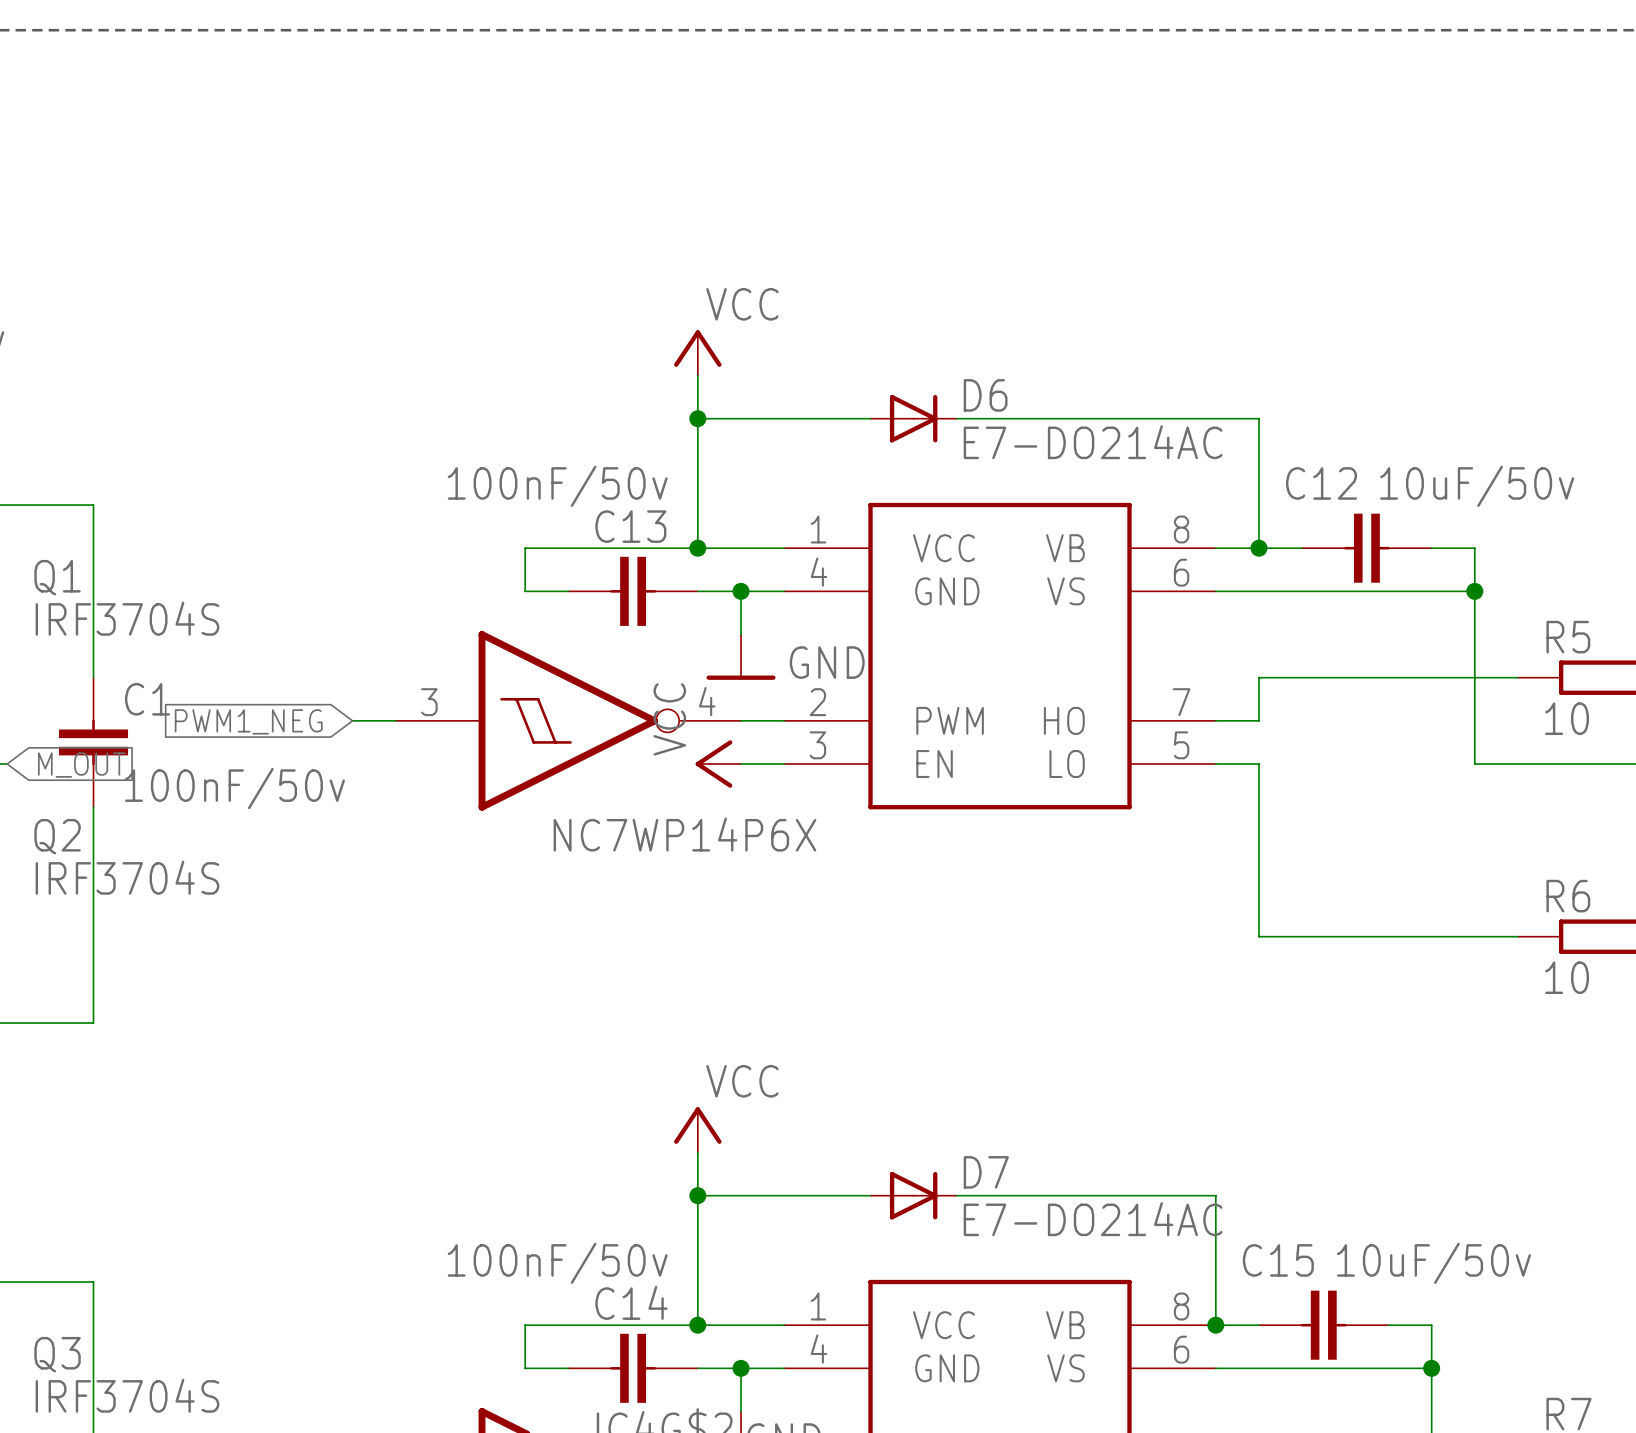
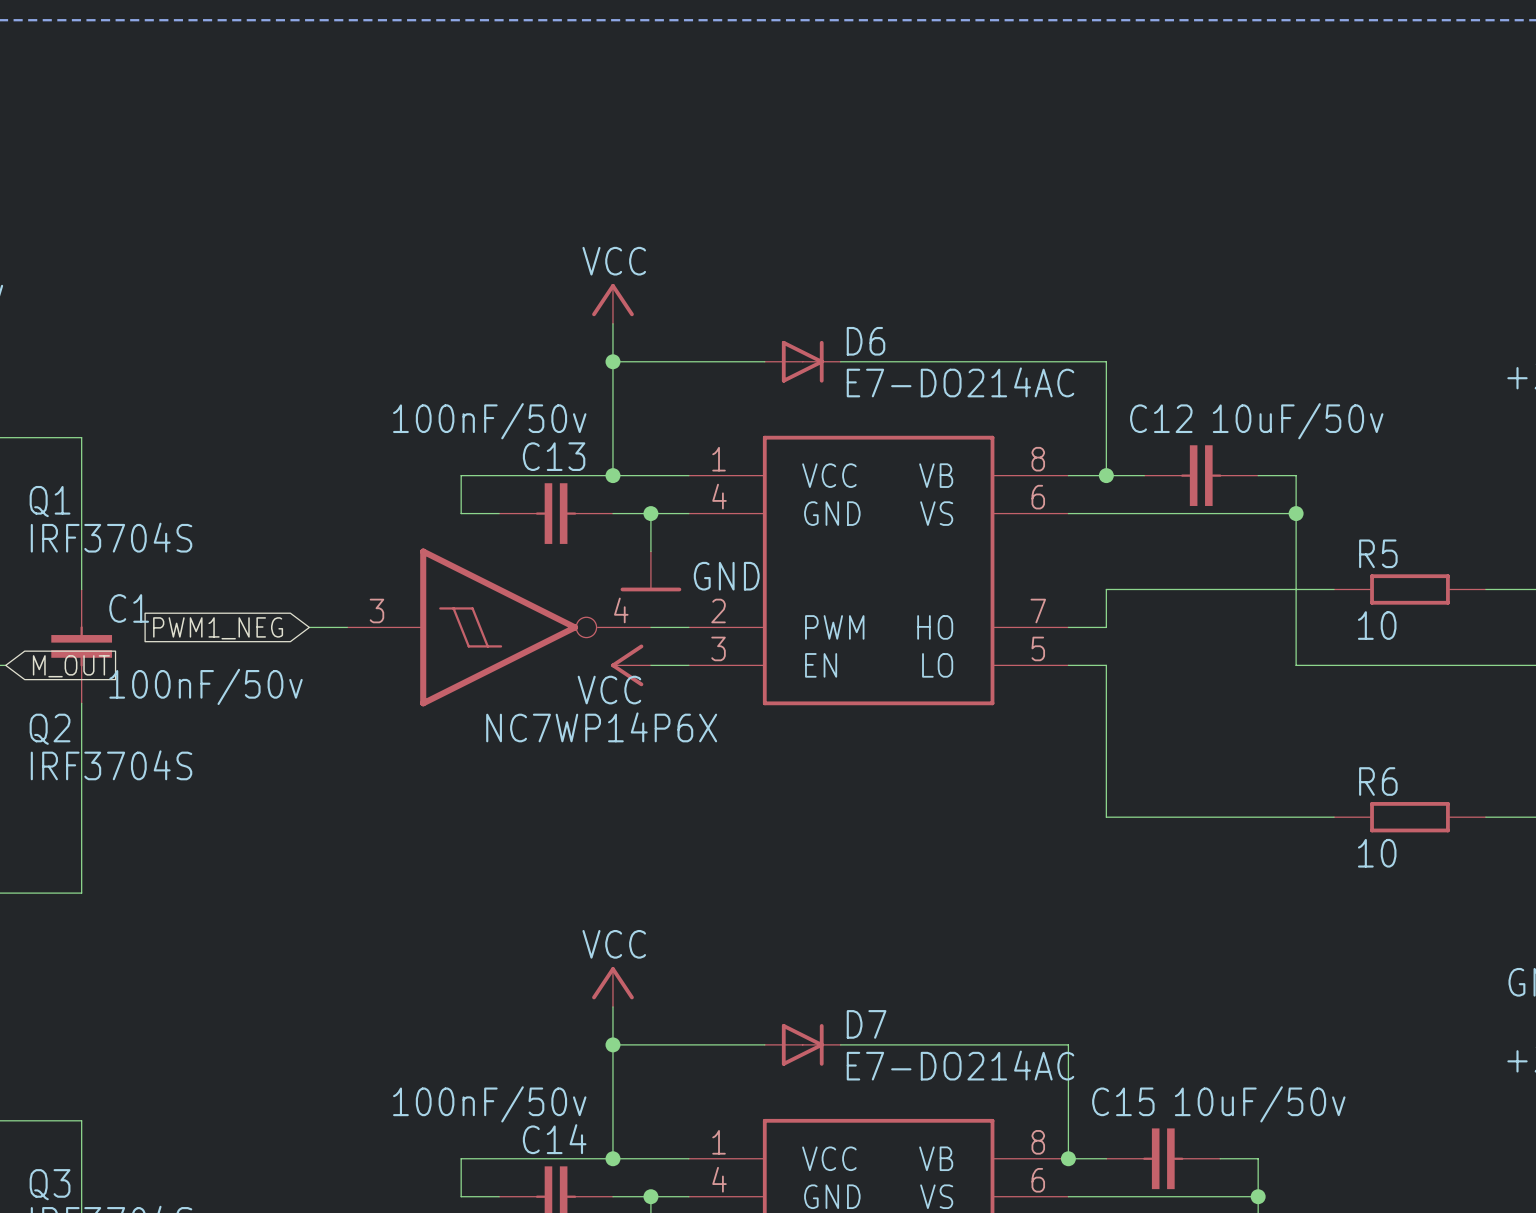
power symbol text position: VCC (742, 304) -> VCC (614, 261)
power symbol text rotation: 0° (669, 719) -> 90° clockwise (609, 690)
power symbol text position: VCC (742, 1081) -> VCC (614, 944)

